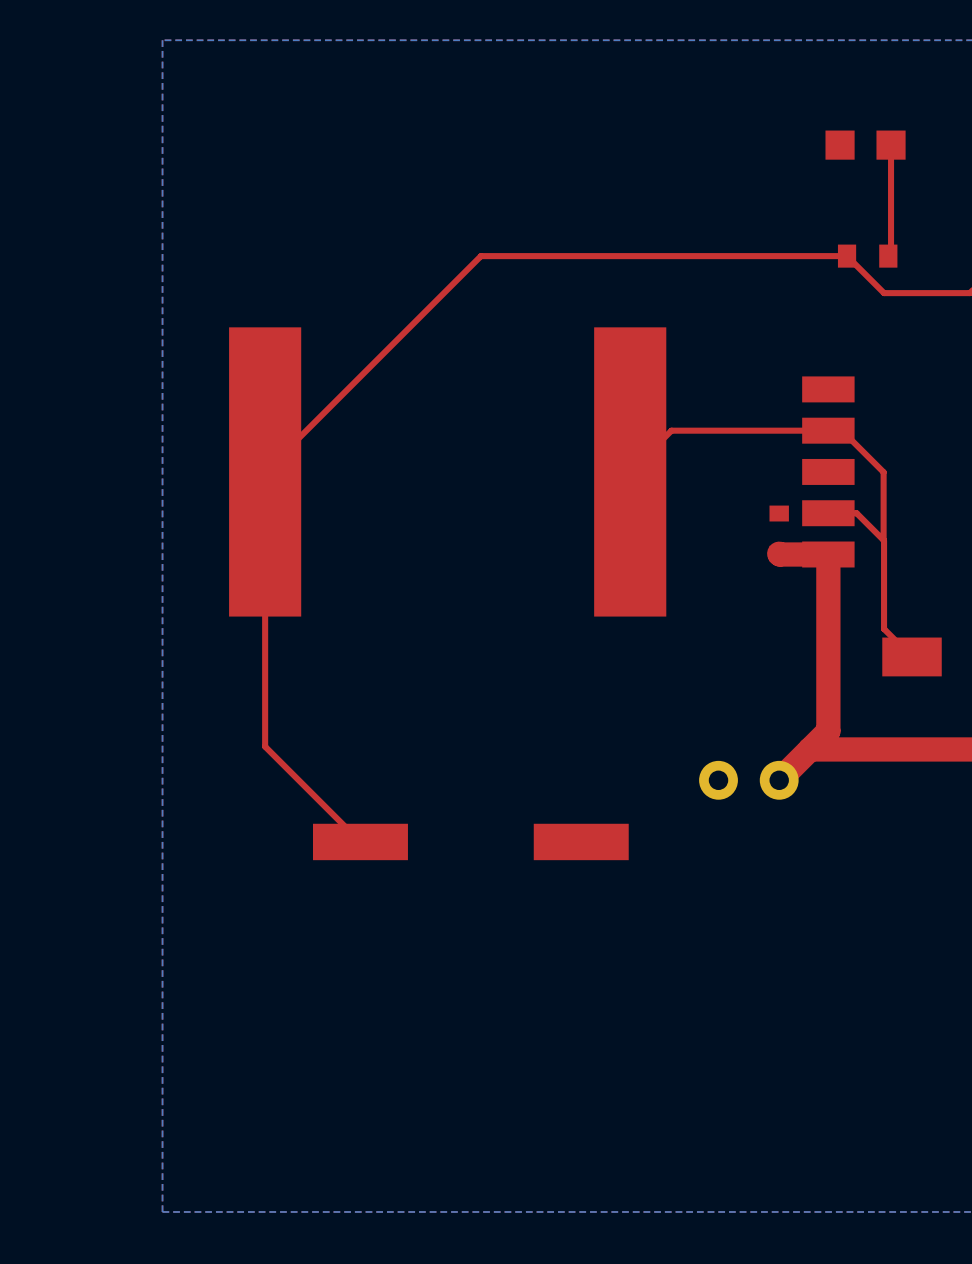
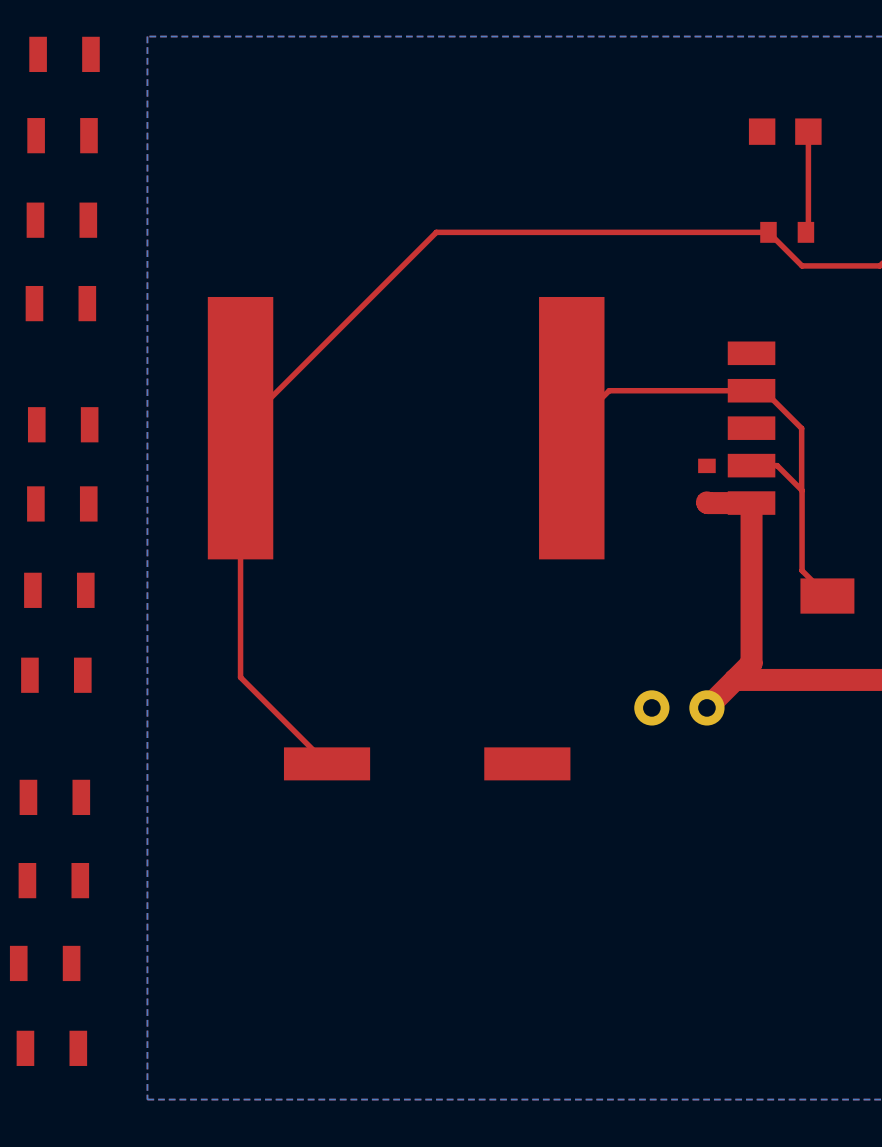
part: none -> (64, 54)
part: none -> (62, 135)
part: none -> (61, 220)
part: none -> (60, 303)
part: none -> (63, 424)
part: none -> (62, 503)
part: none -> (59, 590)
part: none -> (56, 675)
part: none -> (54, 797)
part: none -> (53, 880)
part: none -> (45, 963)
part: none -> (51, 1048)

